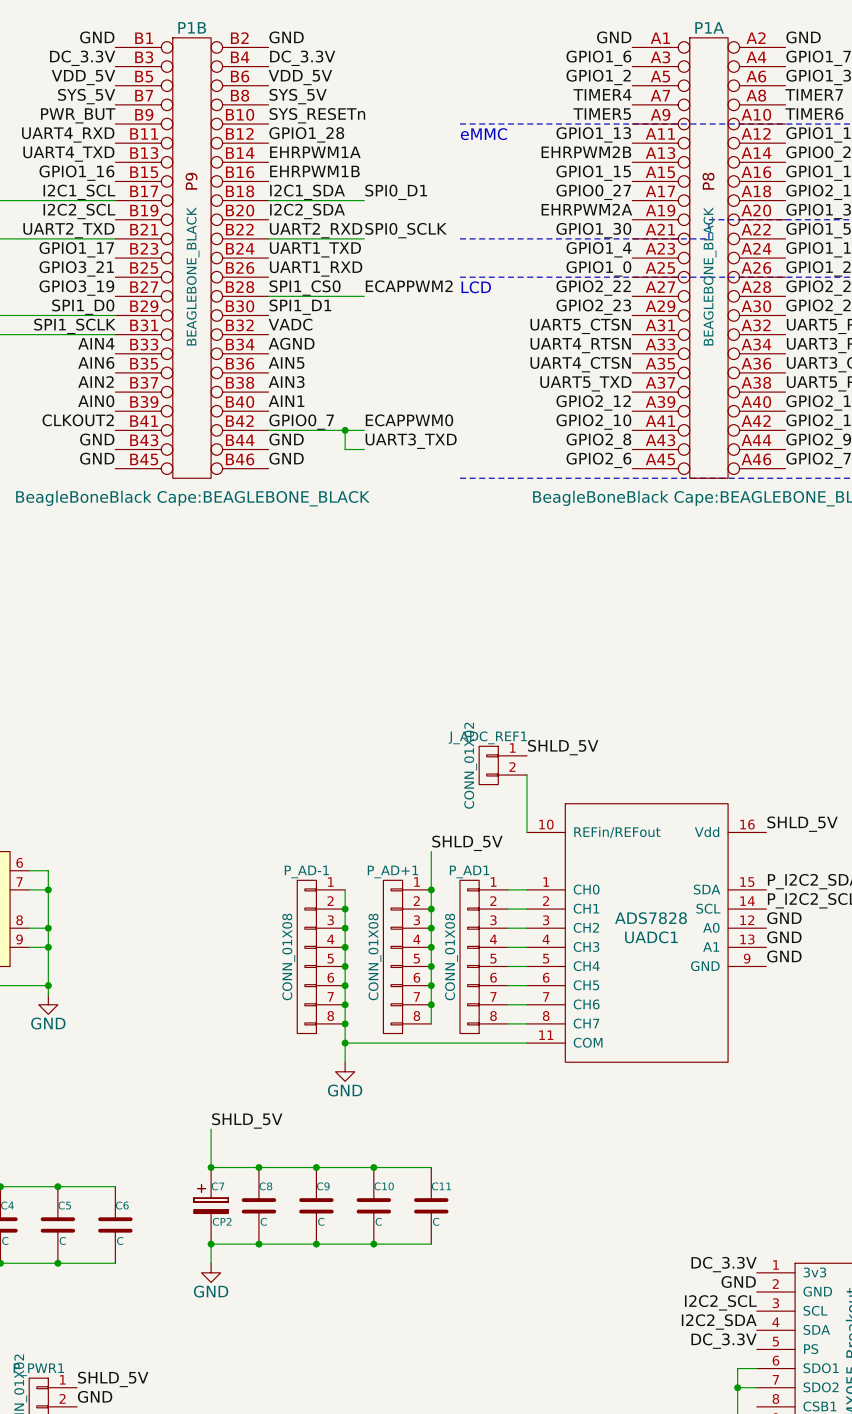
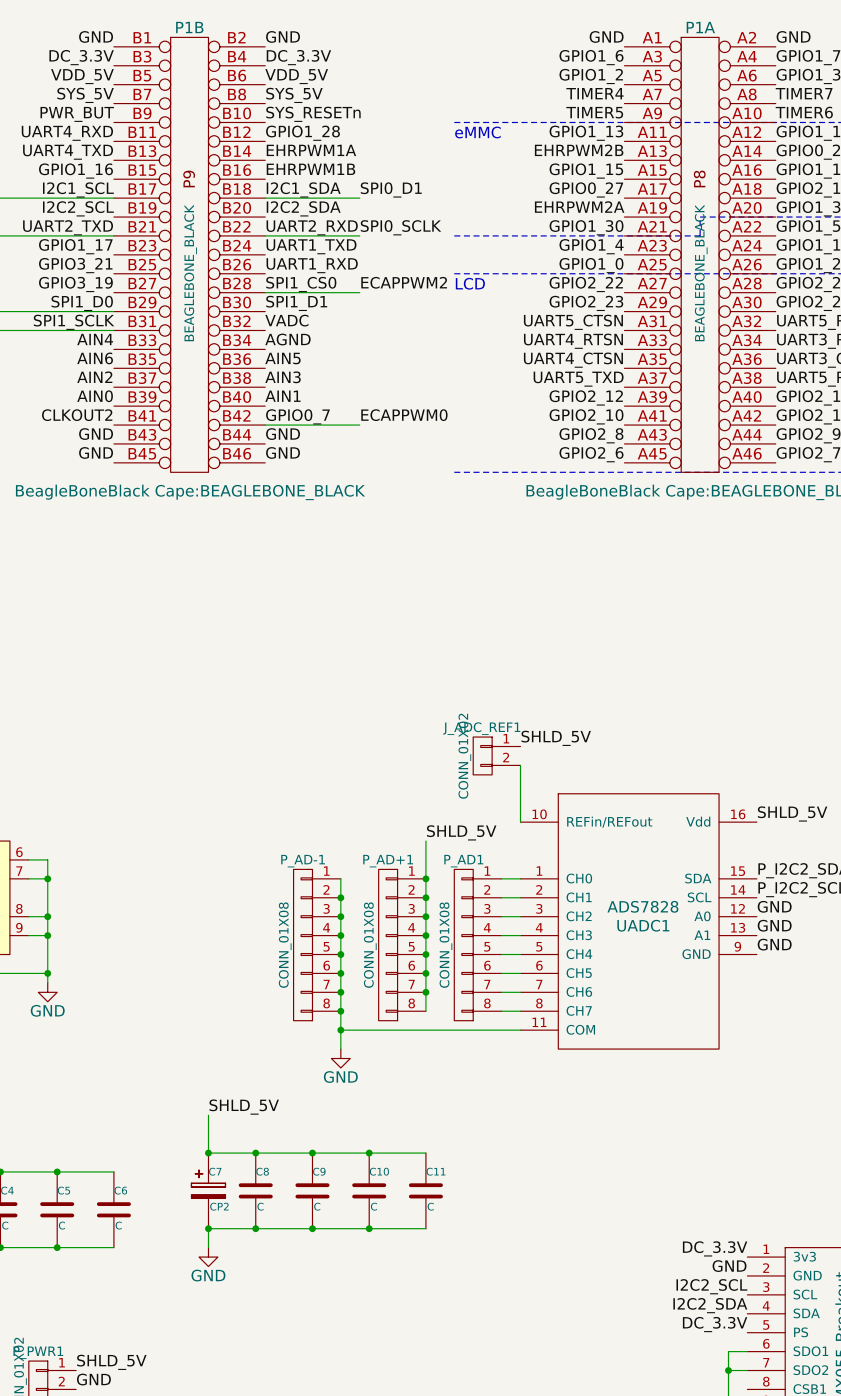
wire: (345, 430) (345, 449) (364, 449) -> none
junction: (345, 430) -> none
label: UART3_TXD (411, 441) -> none

